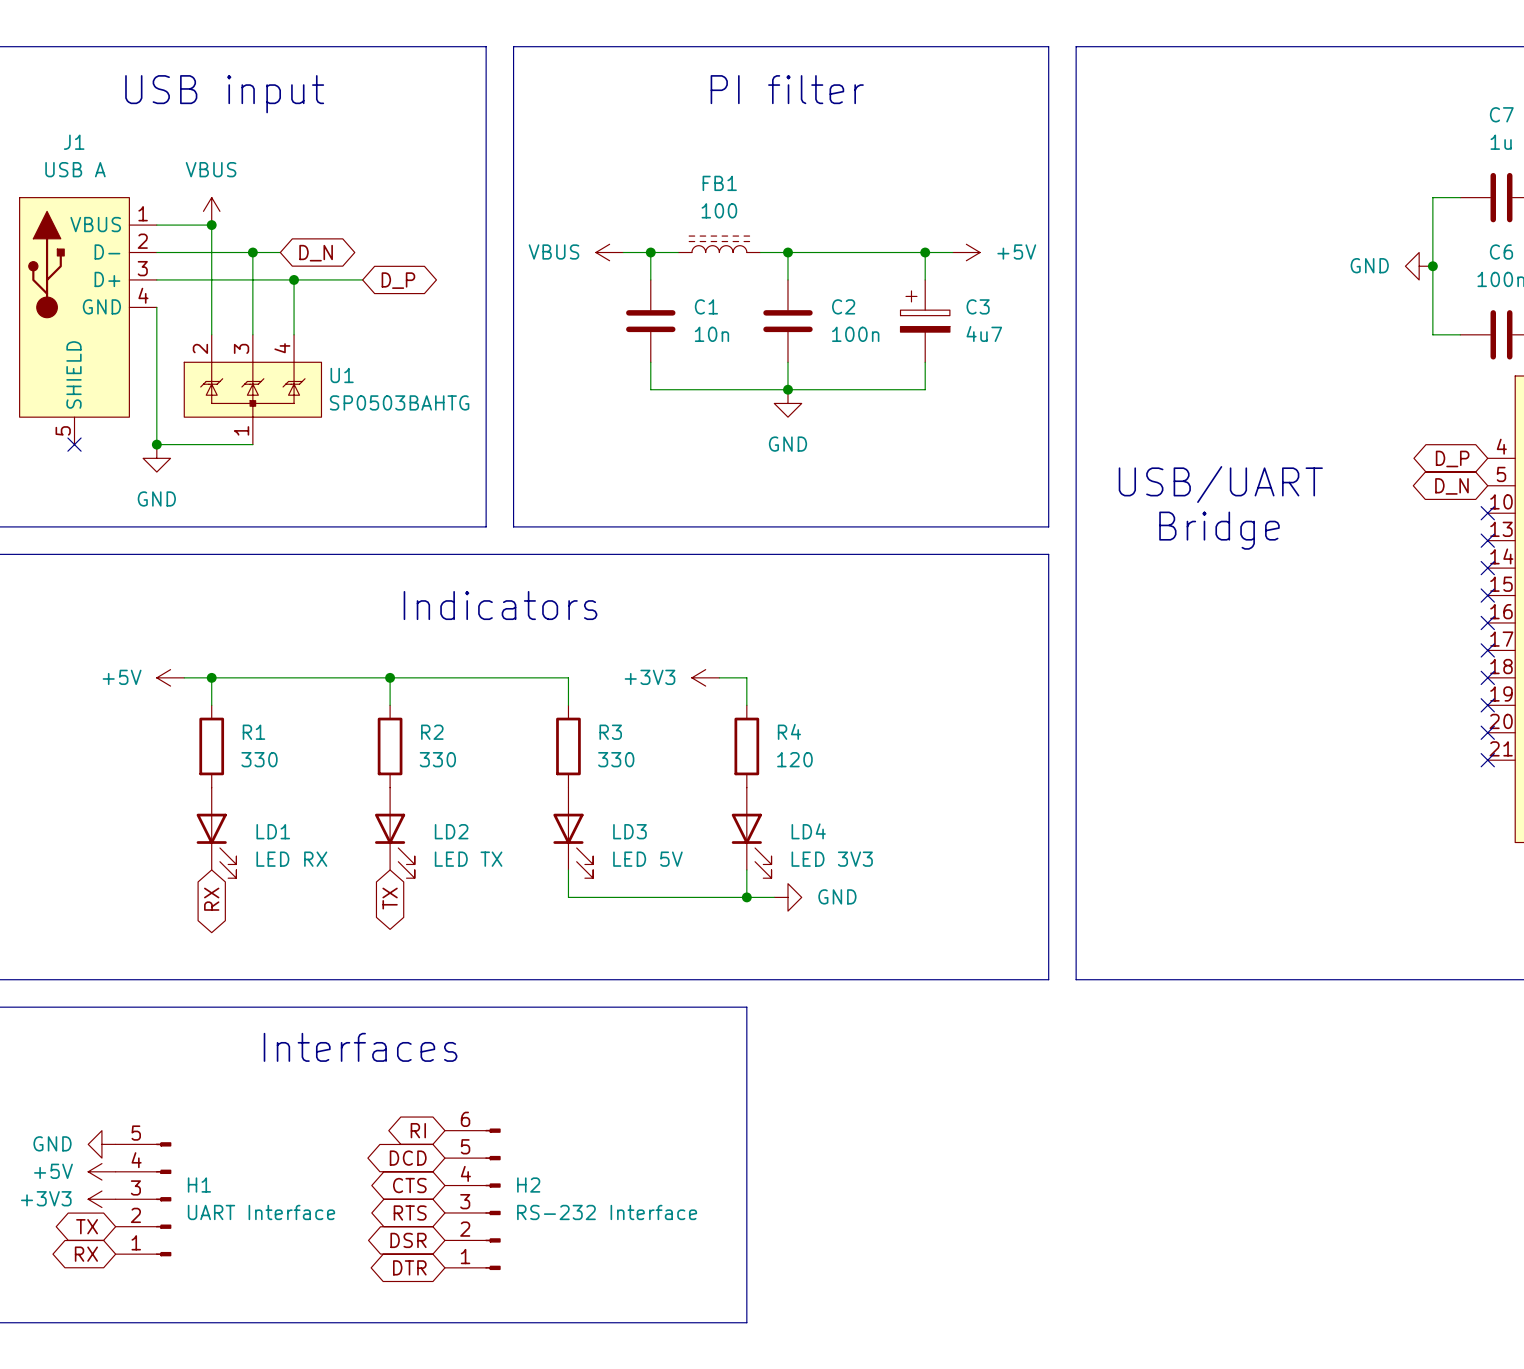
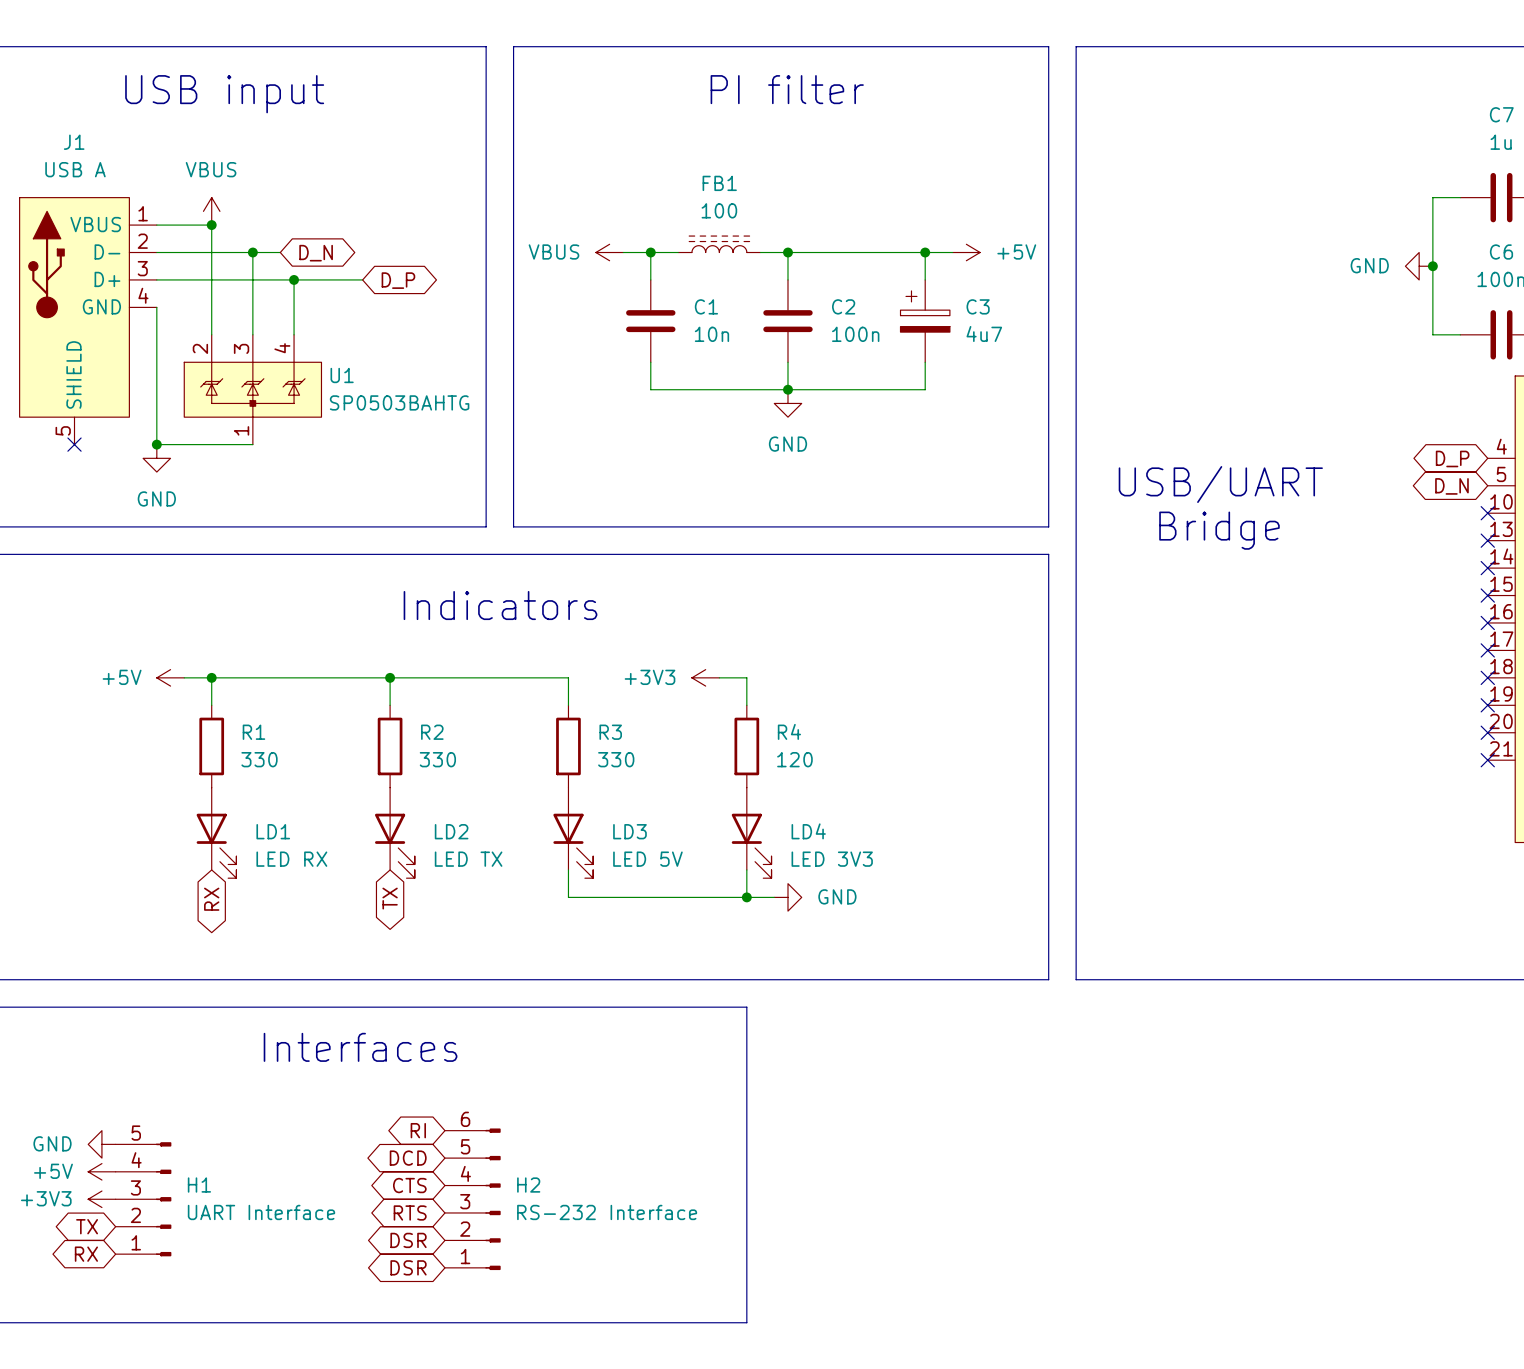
global label: DTR (409, 1267) -> DSR (408, 1267)

